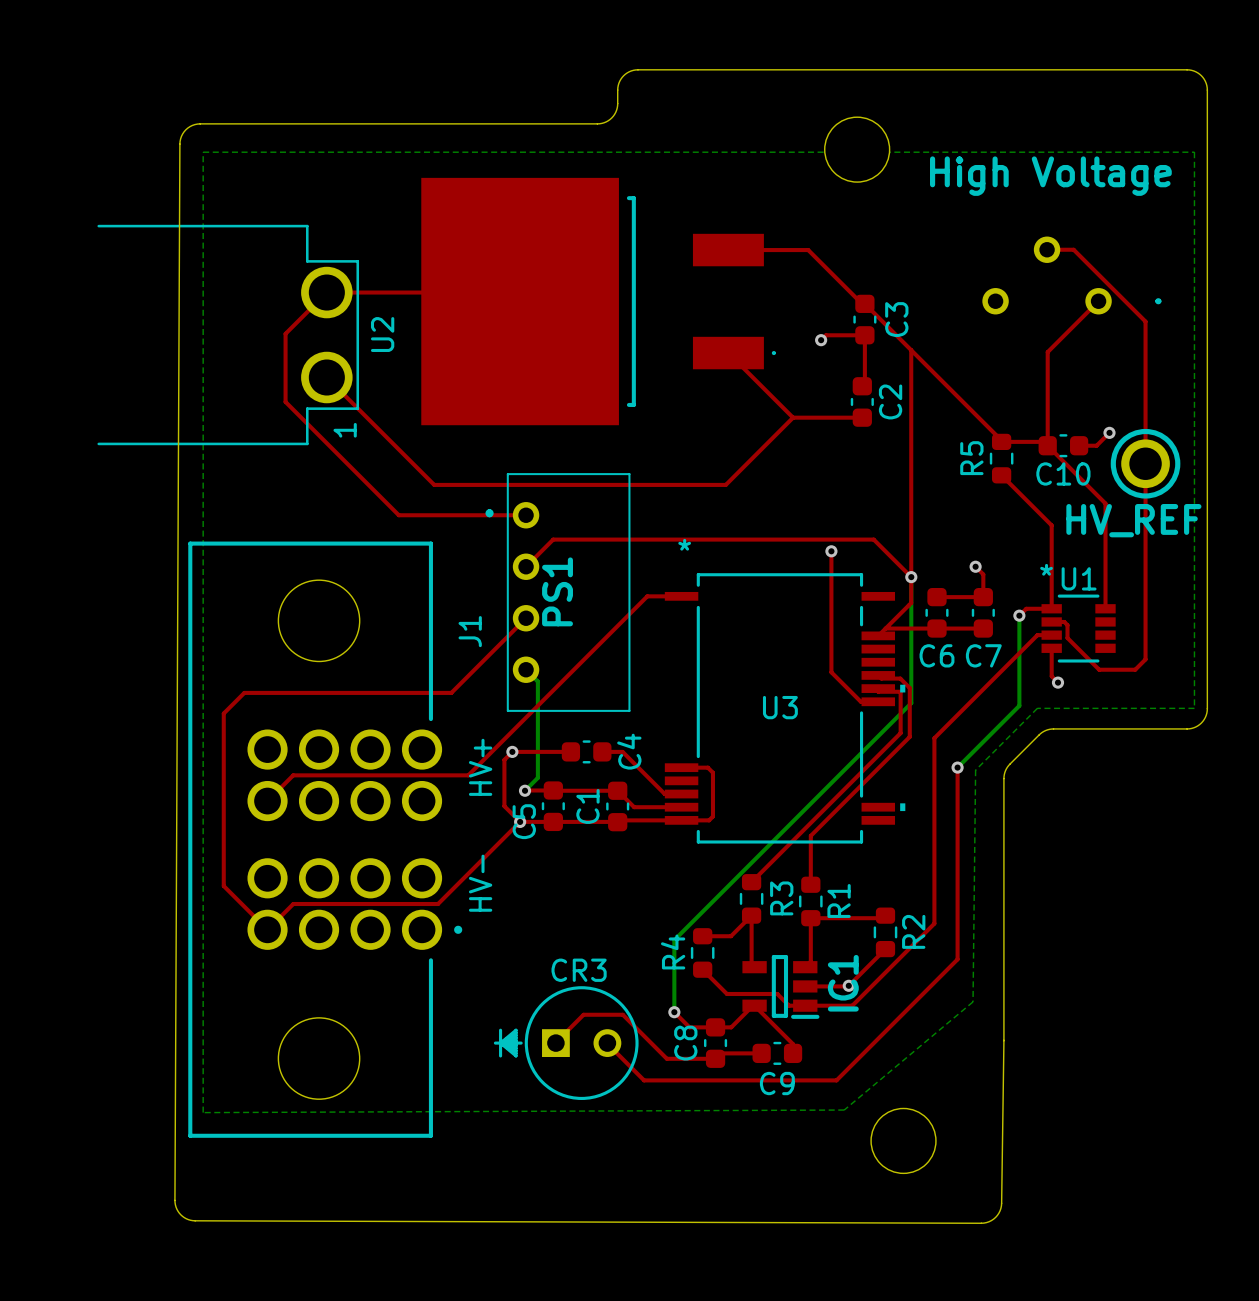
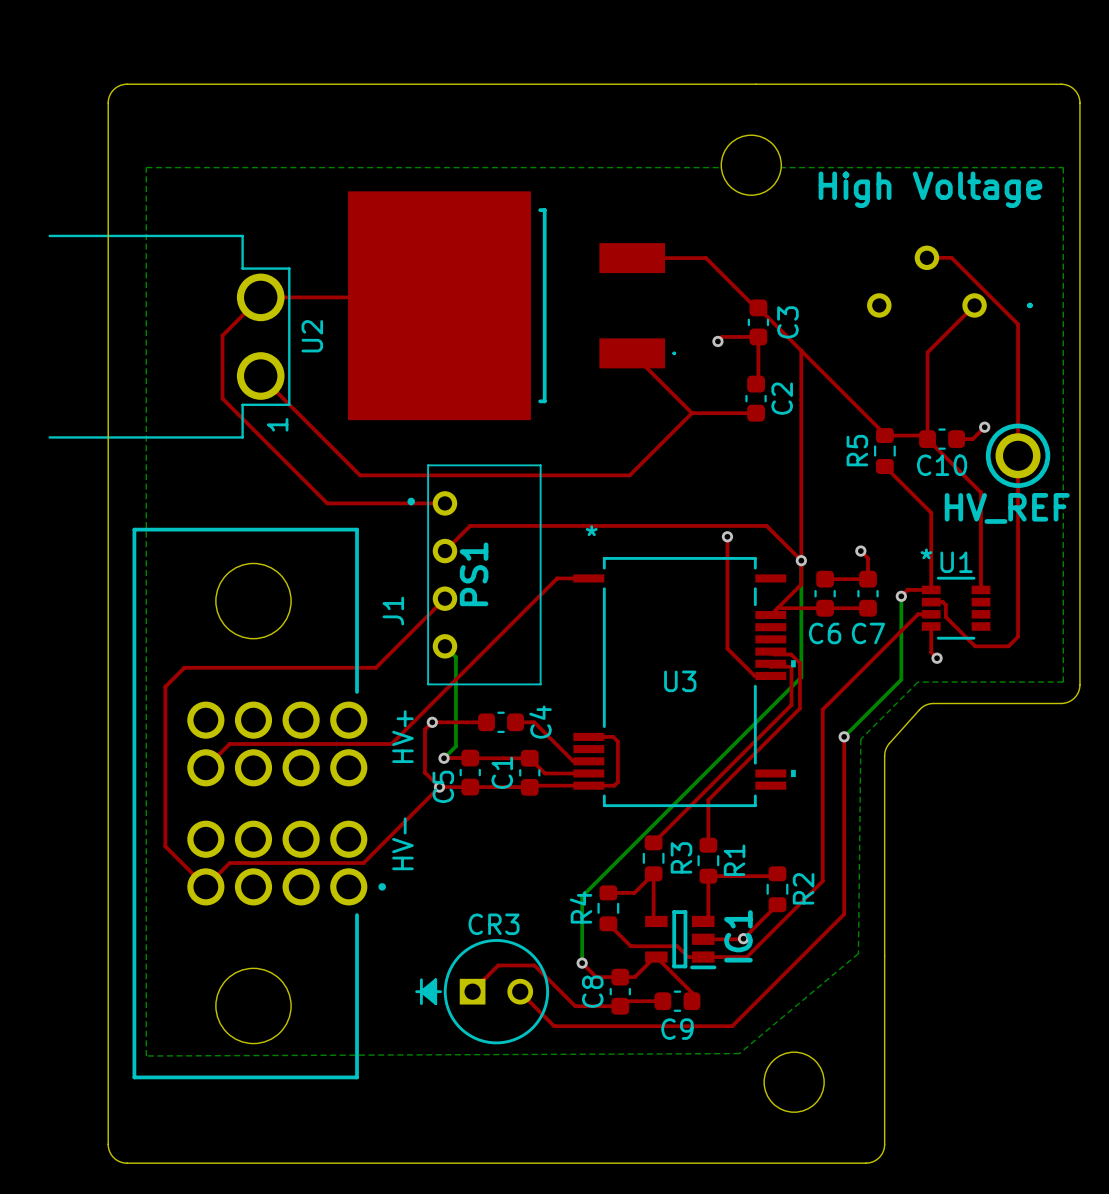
board edge: (637, 69) (1187, 69) (1195, 71) (1202, 77) (1207, 90) (1206, 715) (1199, 724) (1189, 728) (1047, 729) (1039, 734) (1005, 770) (1001, 1203) (998, 1213) (991, 1220) (981, 1223) (188, 1219) (178, 1211) (174, 1200) (179, 144) (181, 136) (190, 126) (200, 123) (599, 123) (610, 119) (615, 112) (618, 85) (622, 77) (629, 71) (637, 69) -> (126, 84) (113, 89) (108, 102) (108, 1144) (111, 1154) (118, 1161) (126, 1163) (865, 1163) (875, 1160) (881, 1154) (884, 1144) (885, 749) (919, 709) (927, 704) (1063, 703) (1074, 698) (1079, 688) (1079, 102) (1077, 93) (1071, 87) (1061, 84) (126, 84)

